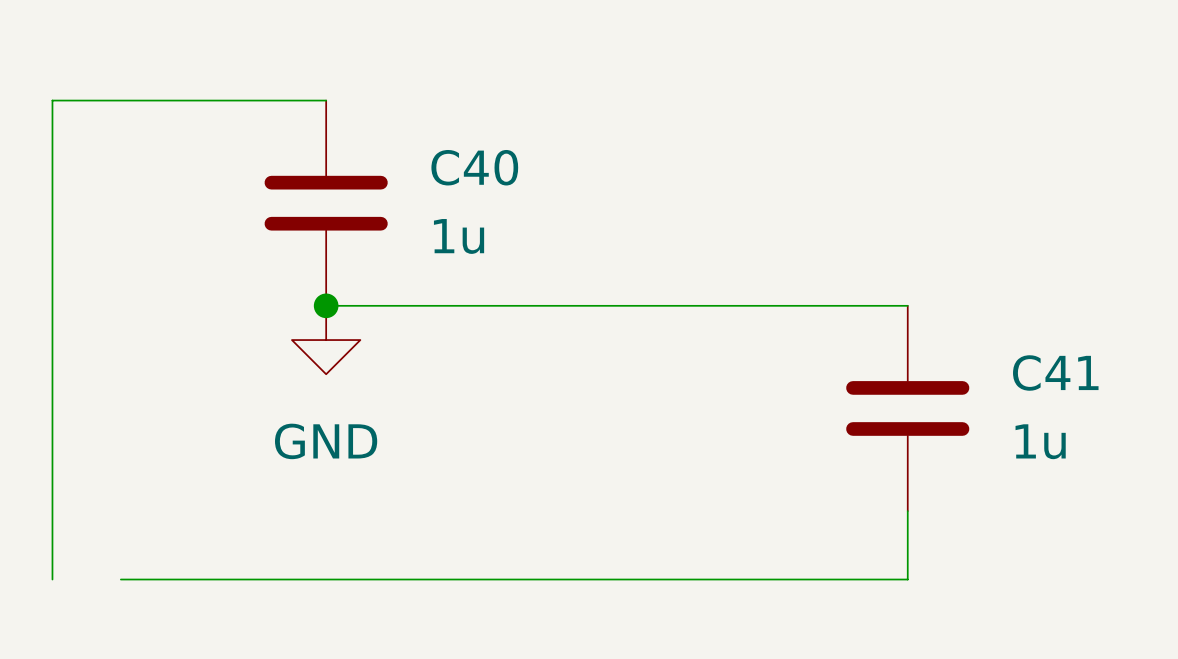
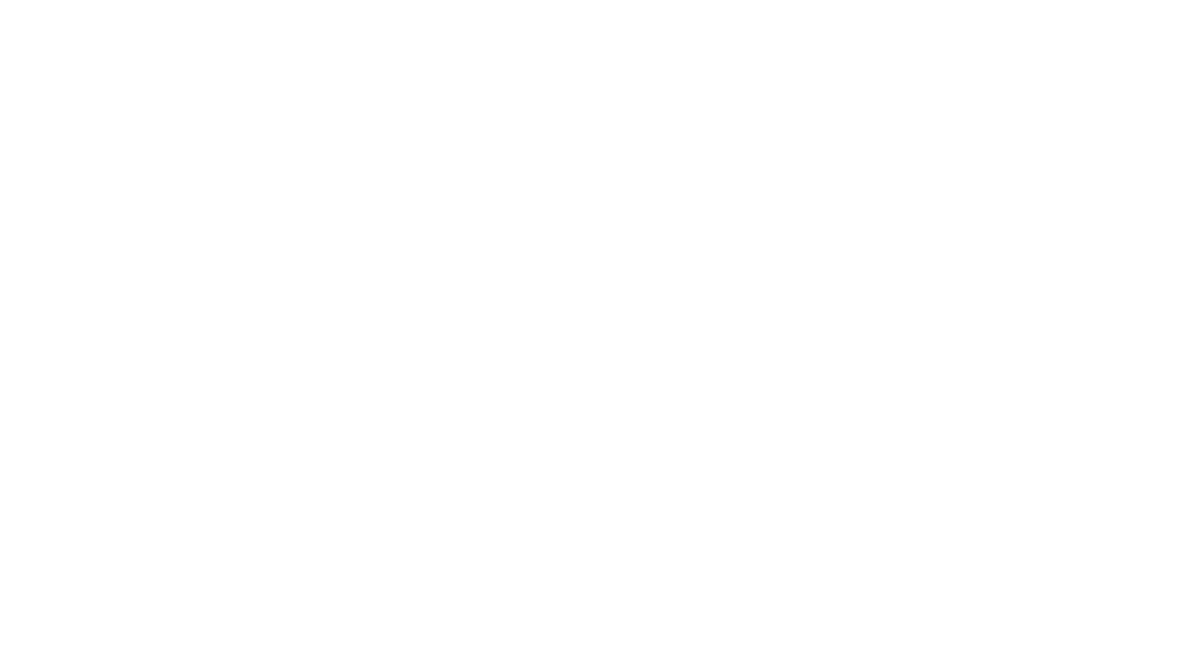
wire: (326, 100) (52, 100) (52, 579) -> none
C40: 1u (326, 203) -> none
wire: (326, 305) (907, 305) -> none
junction: (326, 305) -> none
power symbol: GND (326, 340) -> none
C41: 1u (907, 408) -> none
wire: (907, 511) (907, 579) (120, 579) -> none

